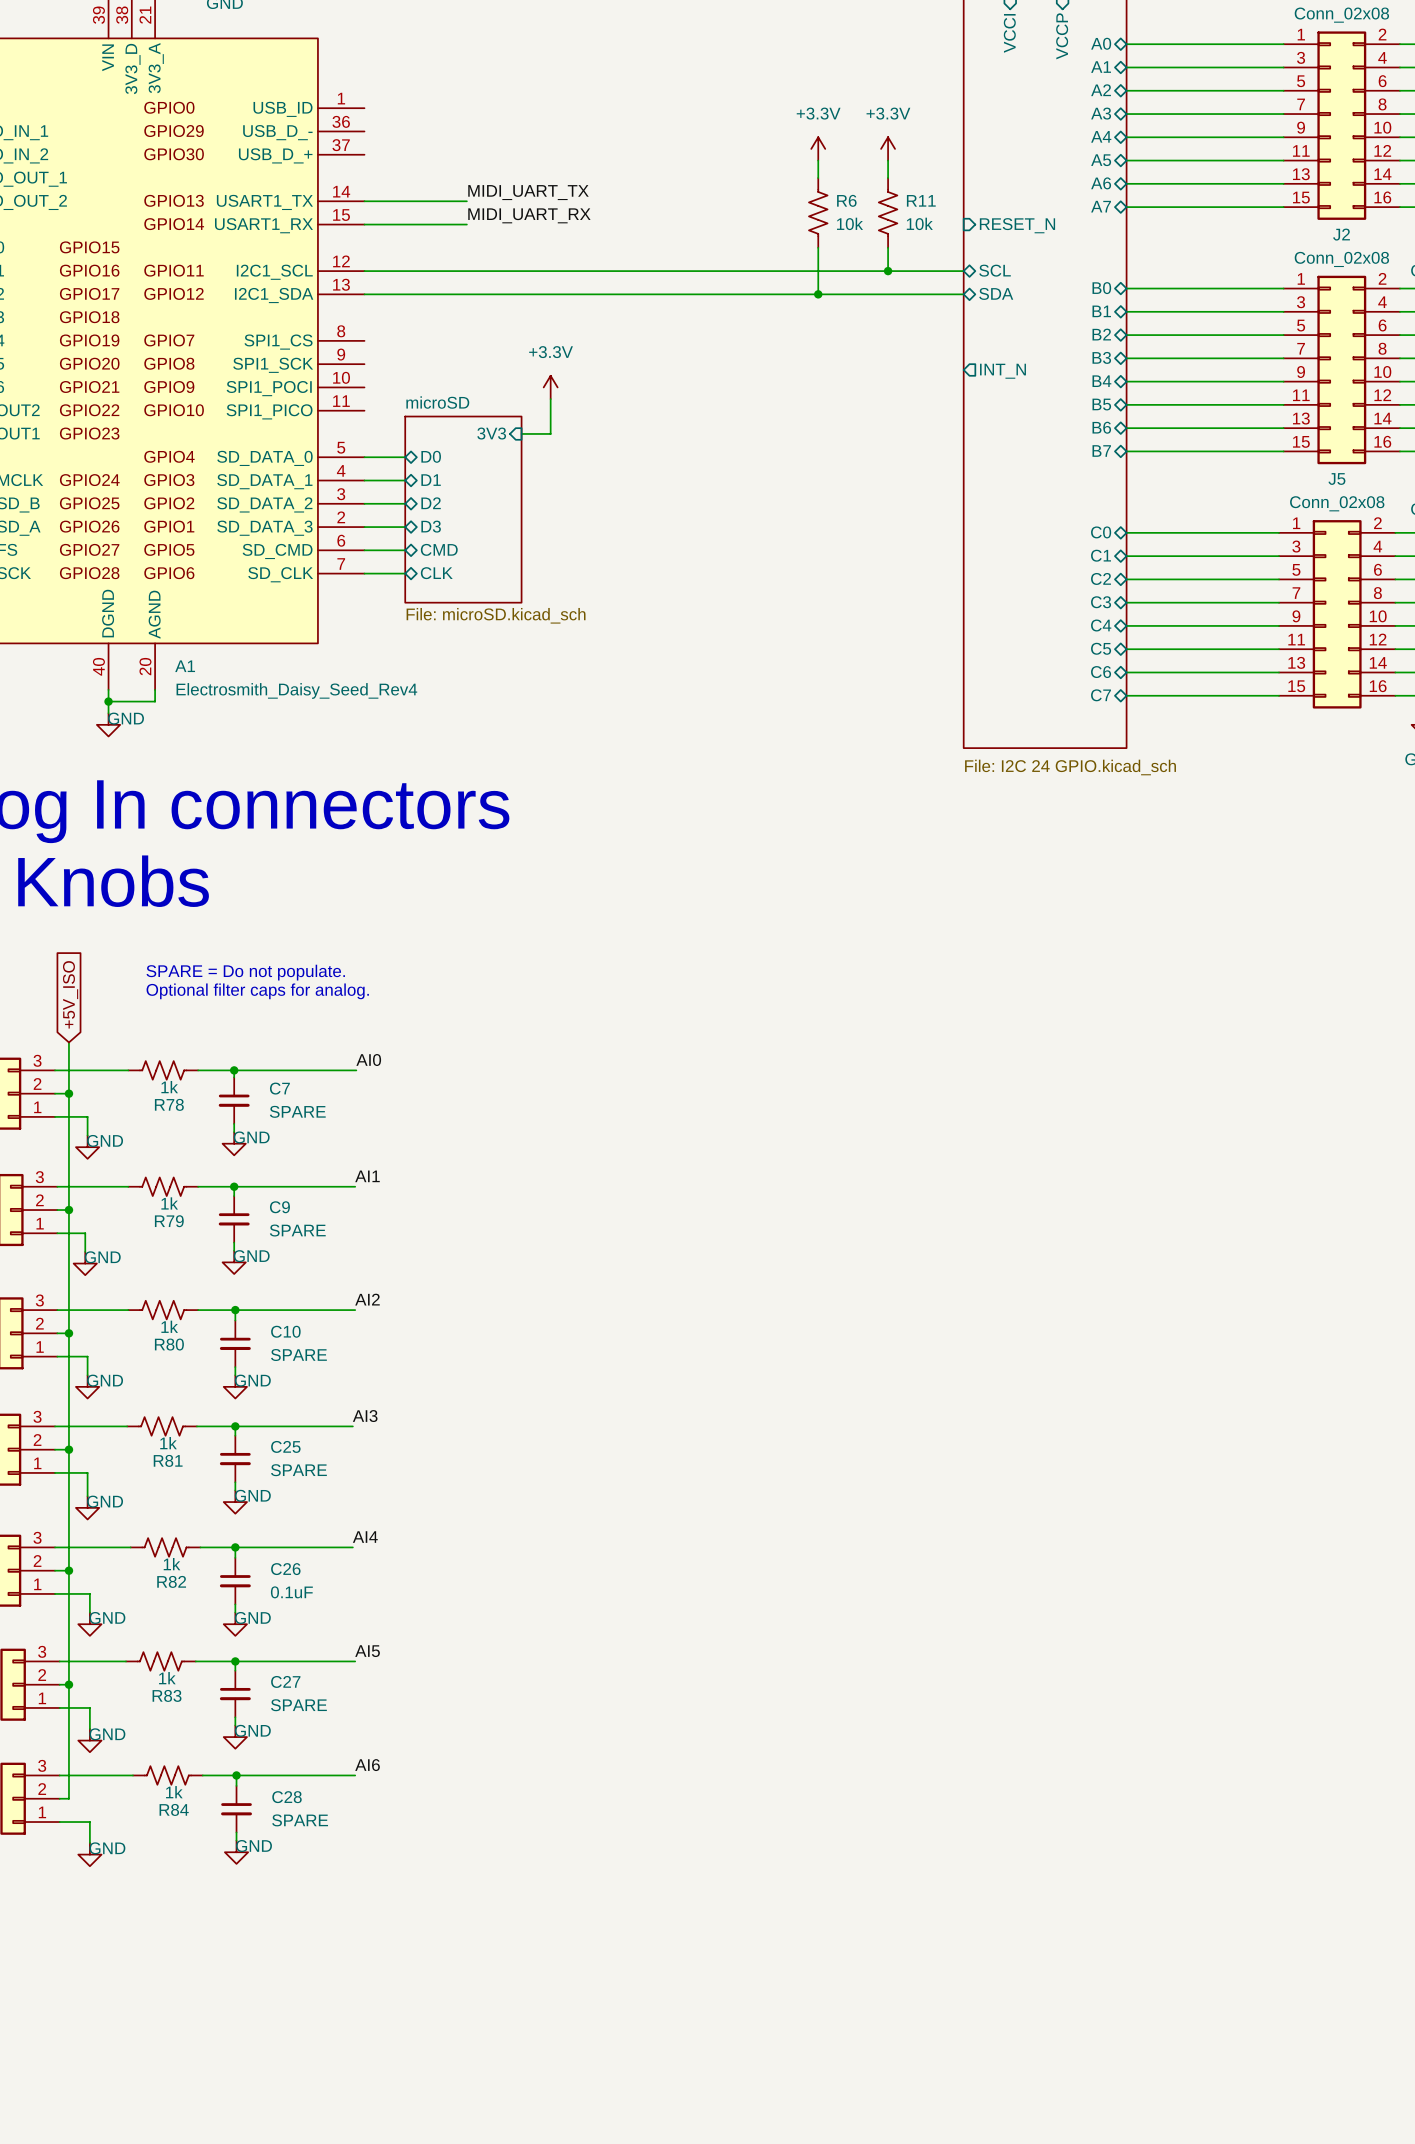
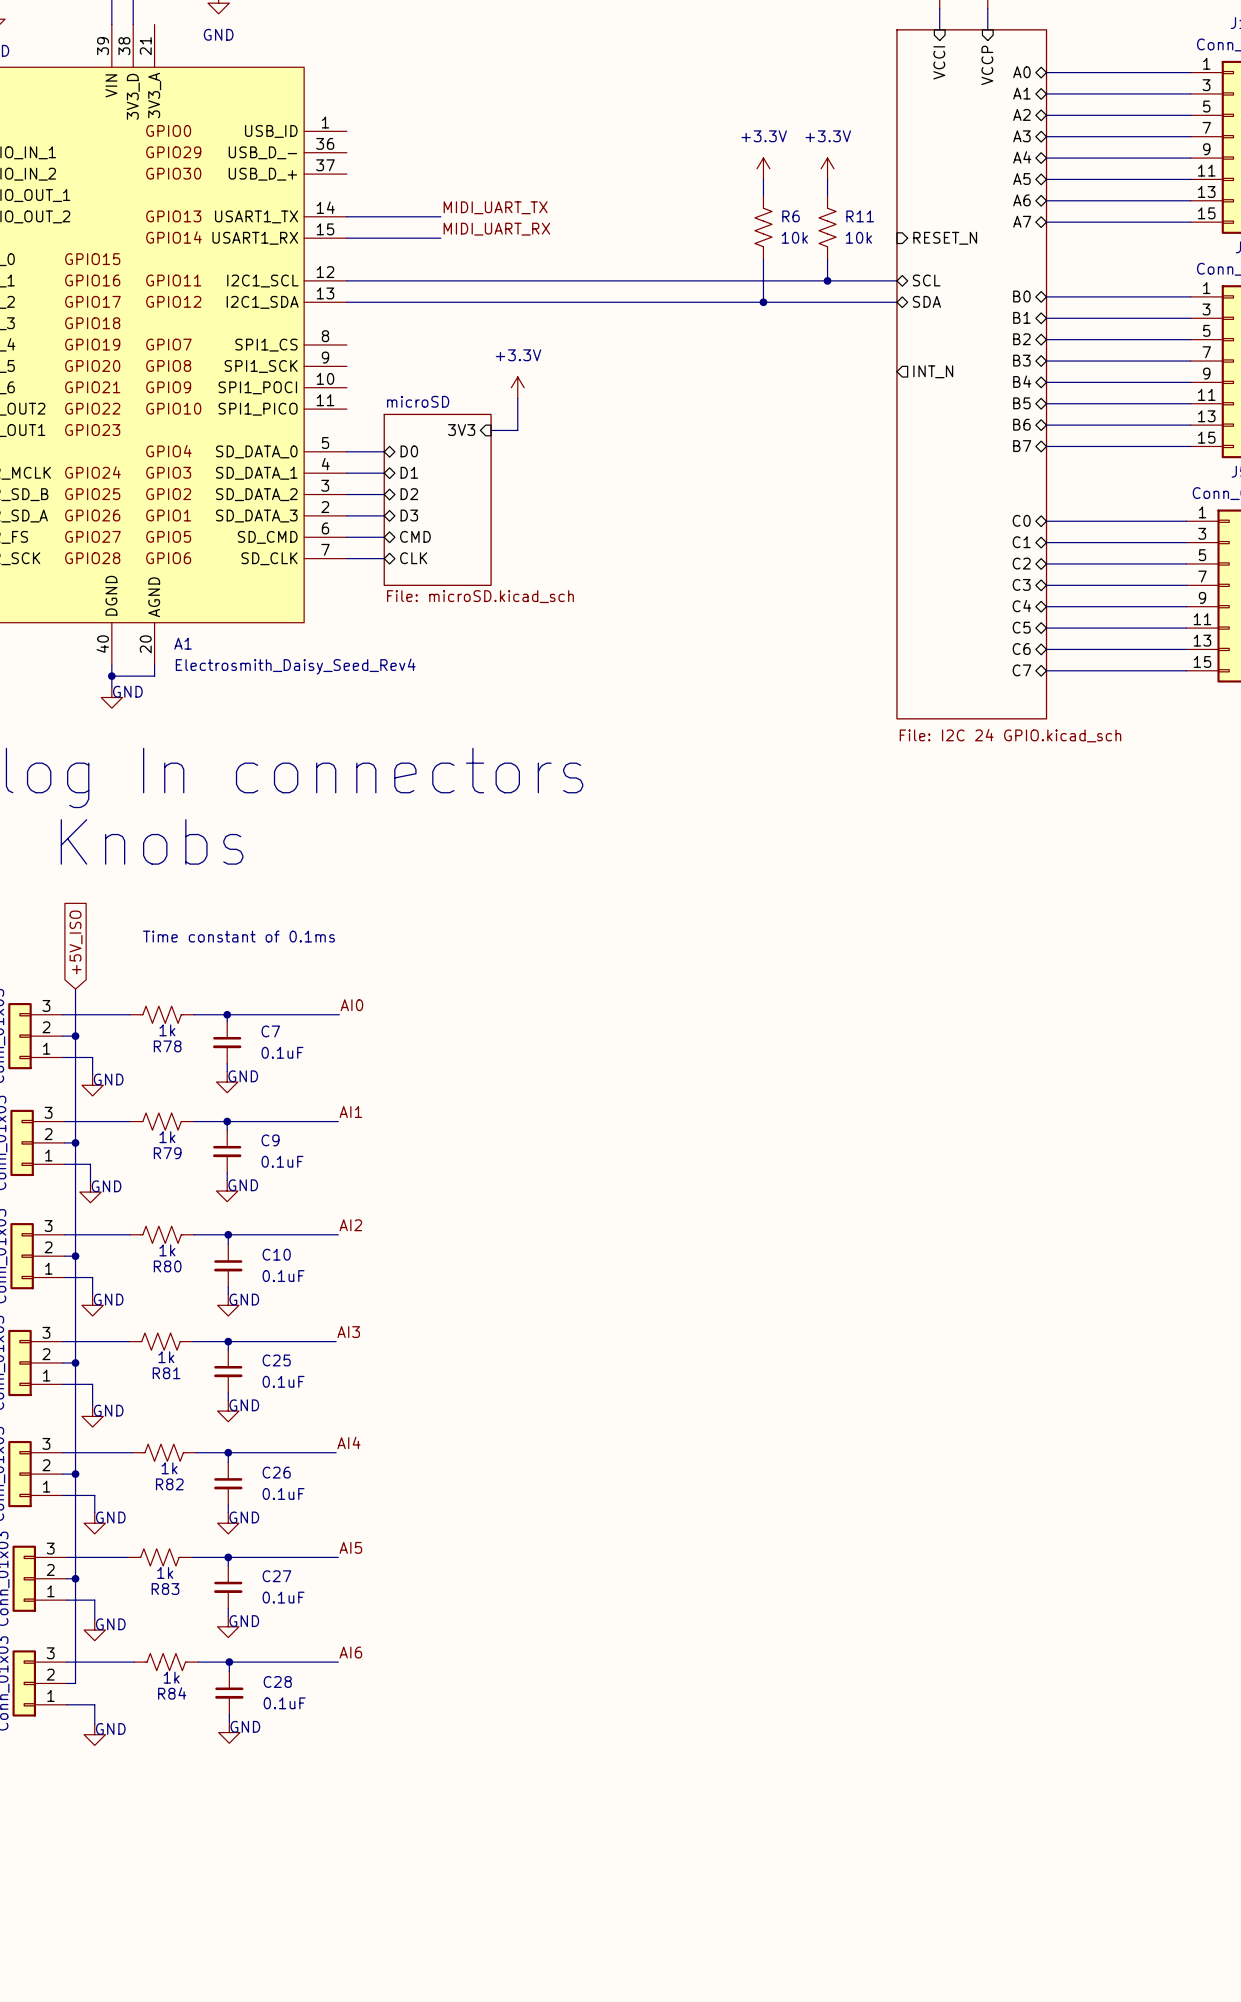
text: SPARE = Do not populate. (245, 972) -> none
text: Optional filter caps for analog. (257, 991) -> Time constant of 0.1ms (238, 936)
C7 value: SPARE (297, 1111) -> 0.1uF (282, 1052)
C9 value: SPARE (297, 1230) -> 0.1uF (282, 1161)
C10 value: SPARE (298, 1355) -> 0.1uF (283, 1276)
C25 value: SPARE (298, 1470) -> 0.1uF (283, 1381)
C27 value: SPARE (298, 1705) -> 0.1uF (283, 1597)
C28 value: SPARE (300, 1820) -> 0.1uF (284, 1703)

